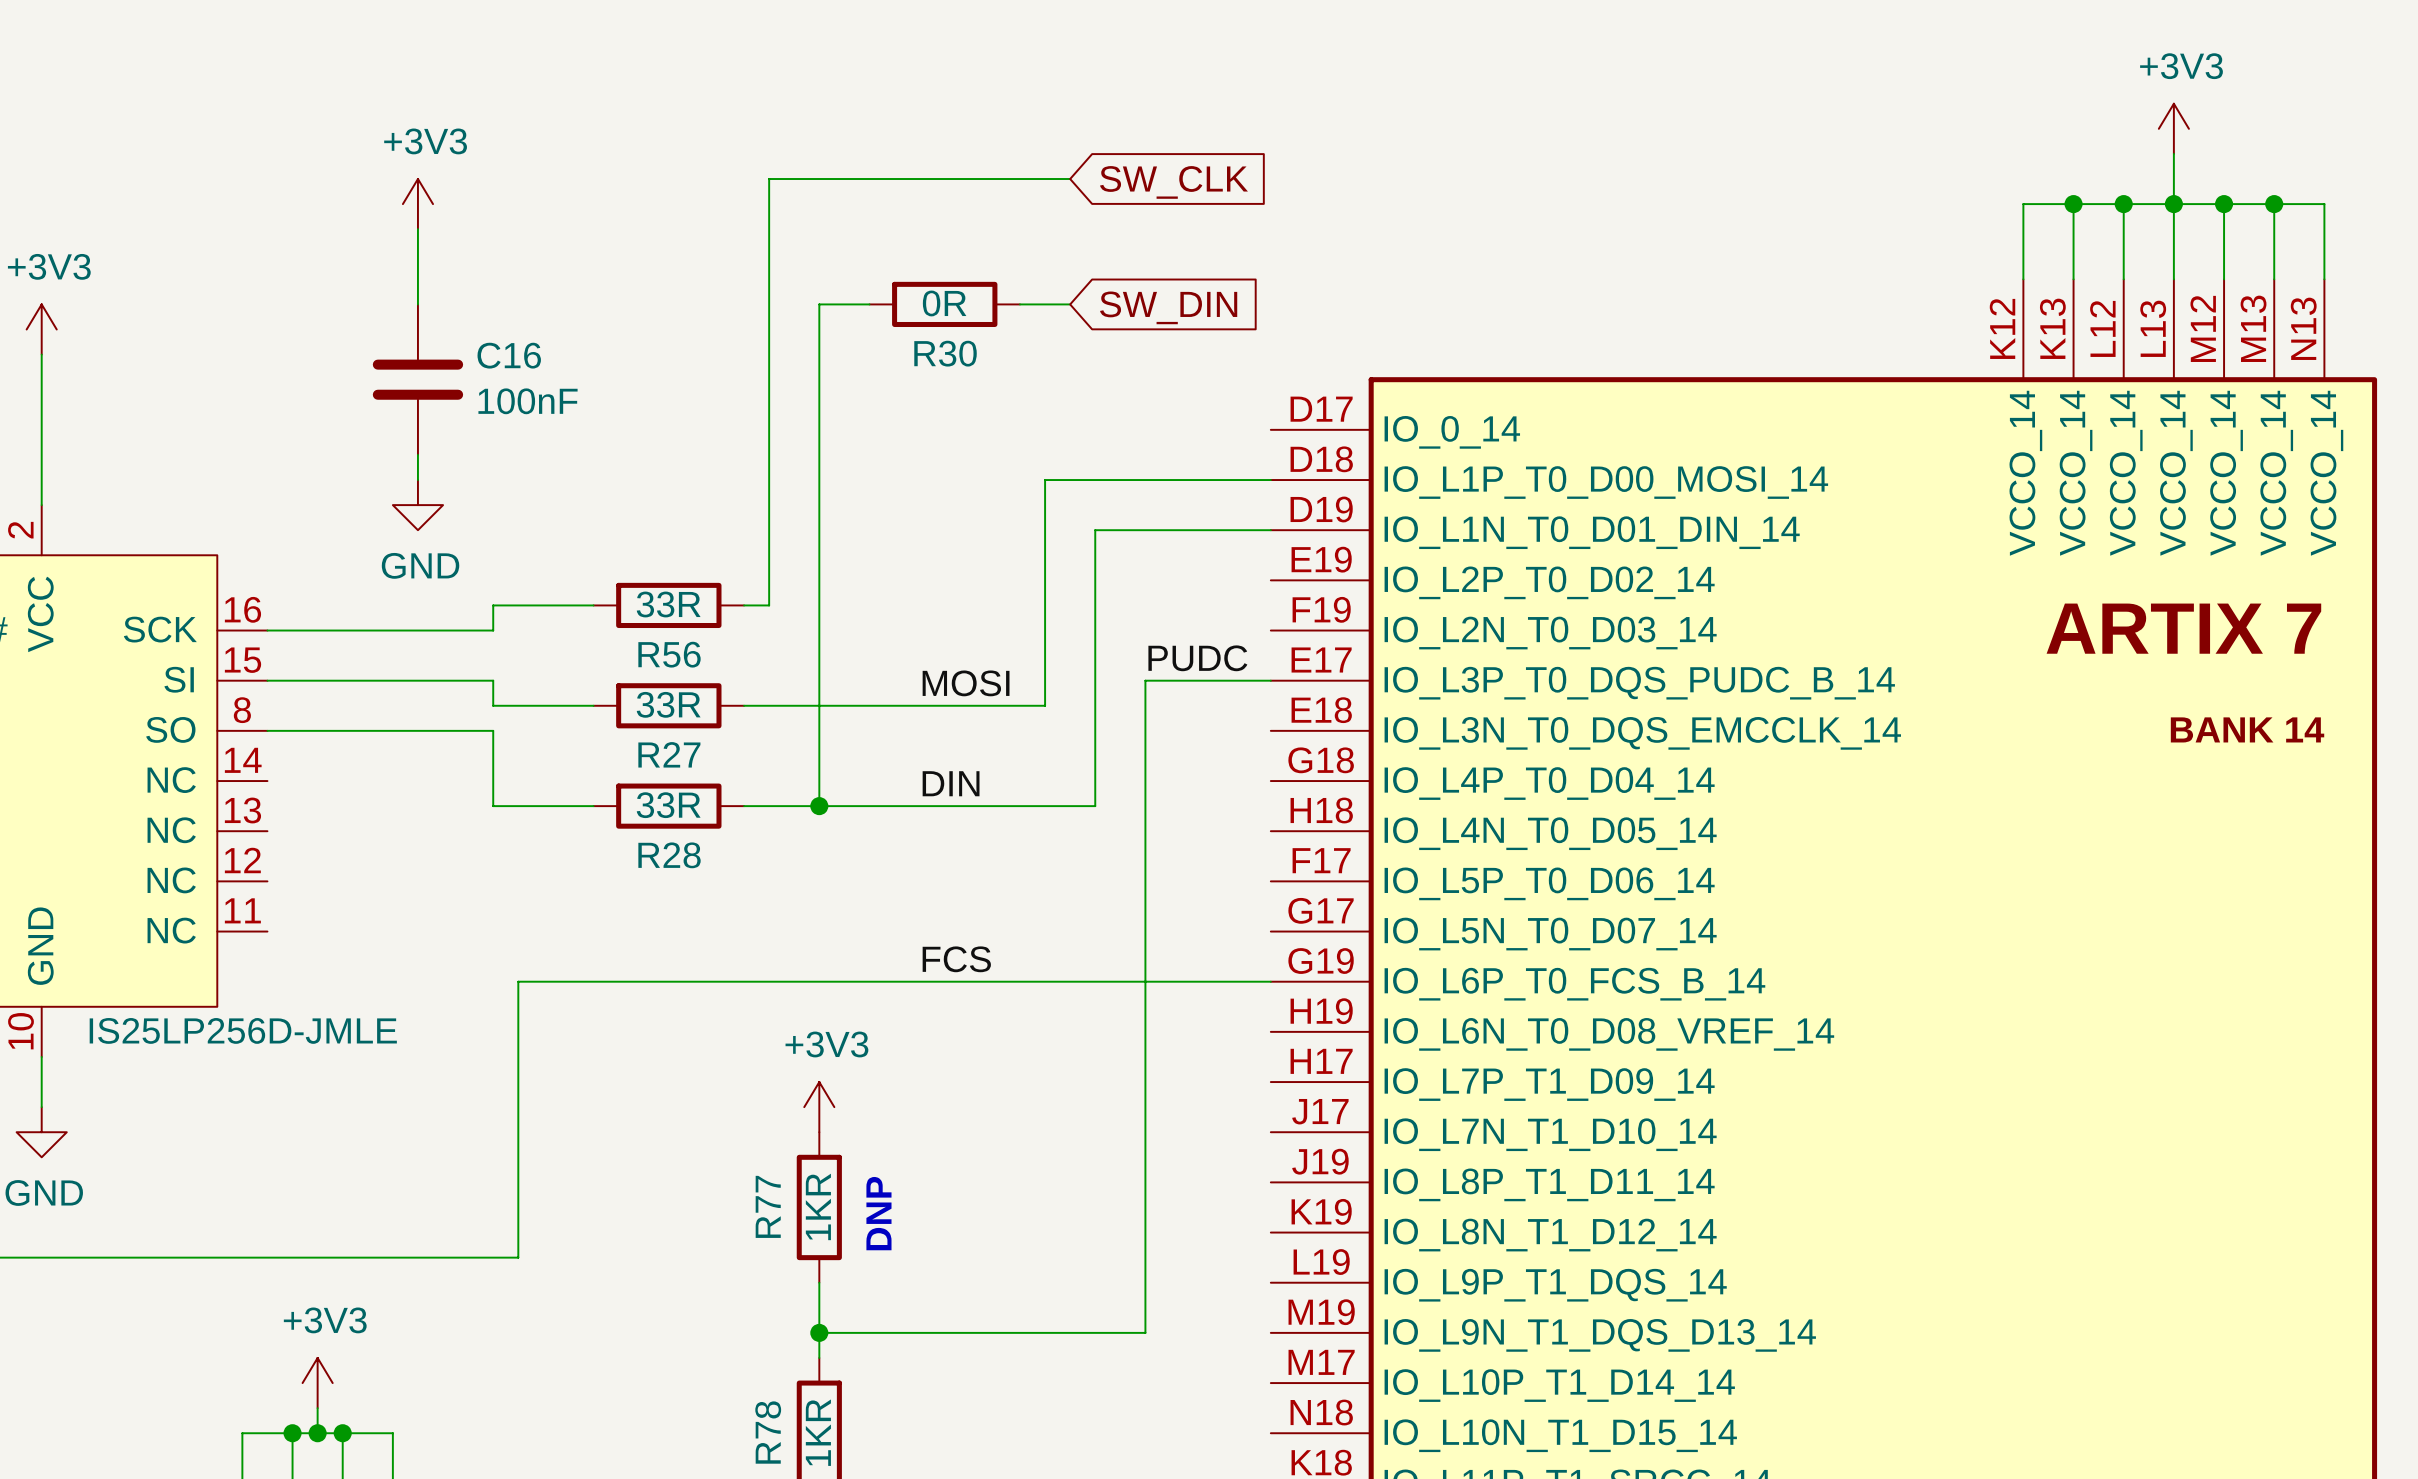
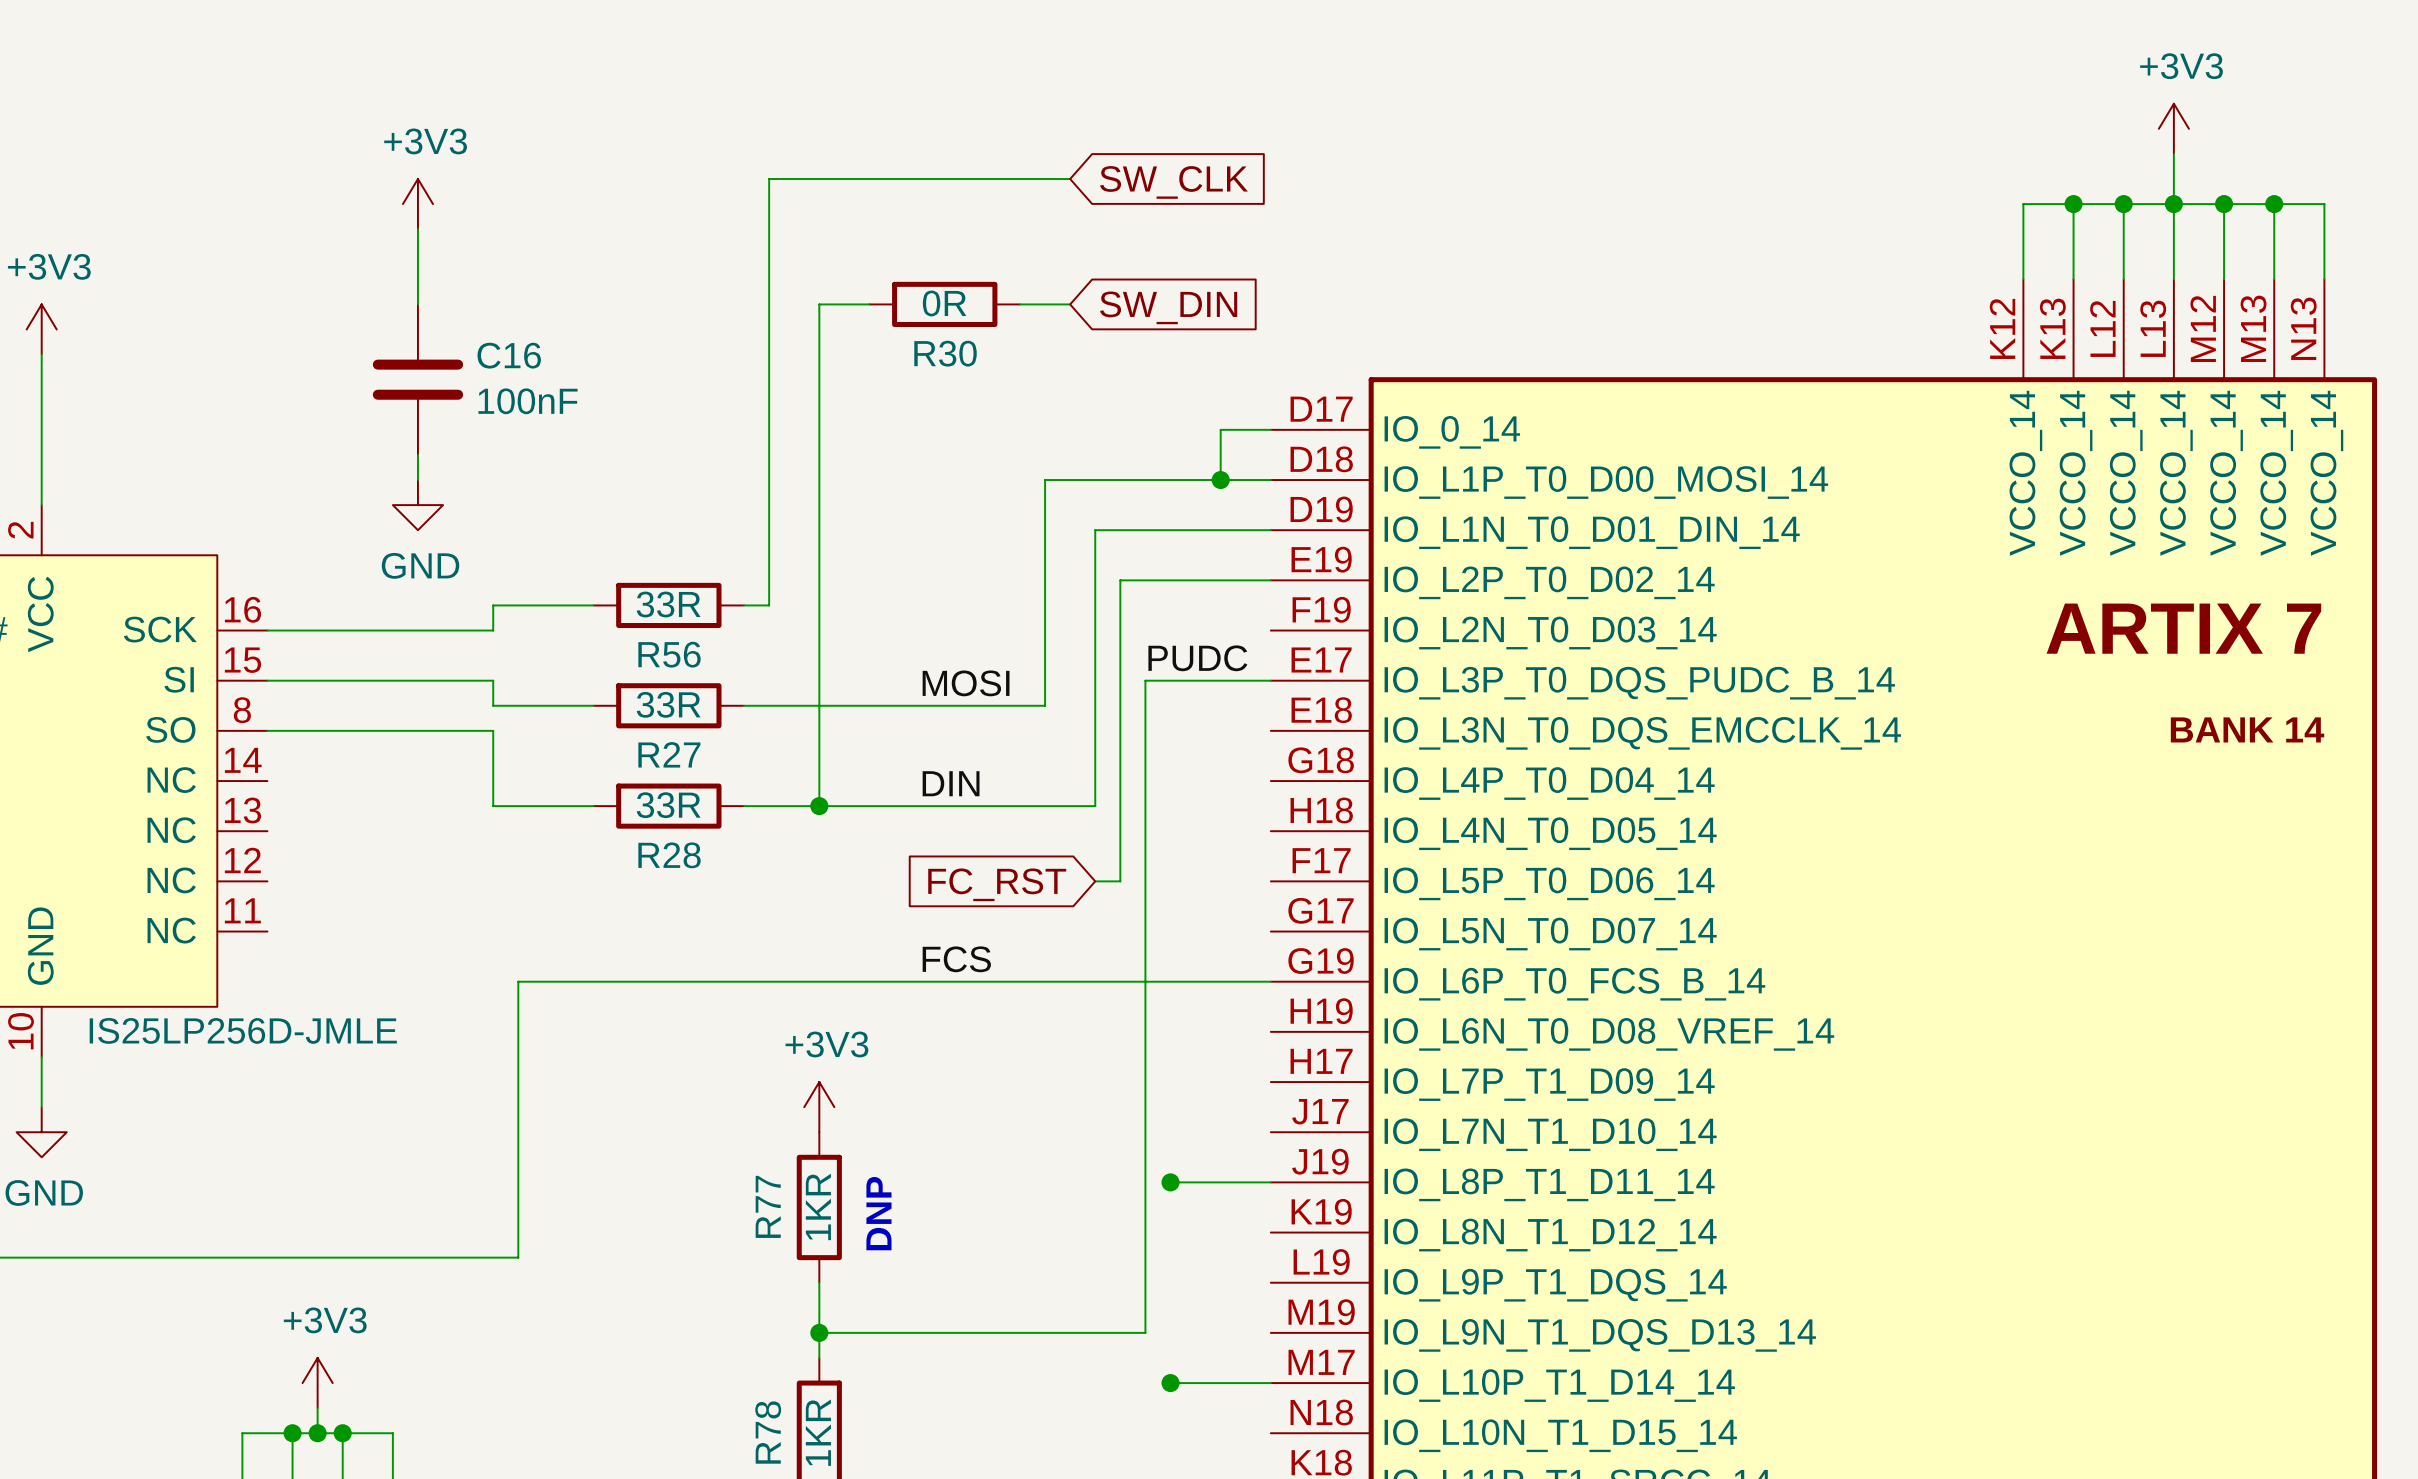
wire: none -> (1270, 429) (1220, 429) (1220, 480)
junction: none -> (1220, 480)
wire: none -> (1270, 580) (1120, 580) (1120, 881) (1095, 881)
global label: none -> FC_RST (997, 884)
wire: none -> (1170, 1182) (1270, 1182)
junction: none -> (1170, 1182)
wire: none -> (1170, 1383) (1270, 1383)
junction: none -> (1170, 1383)

